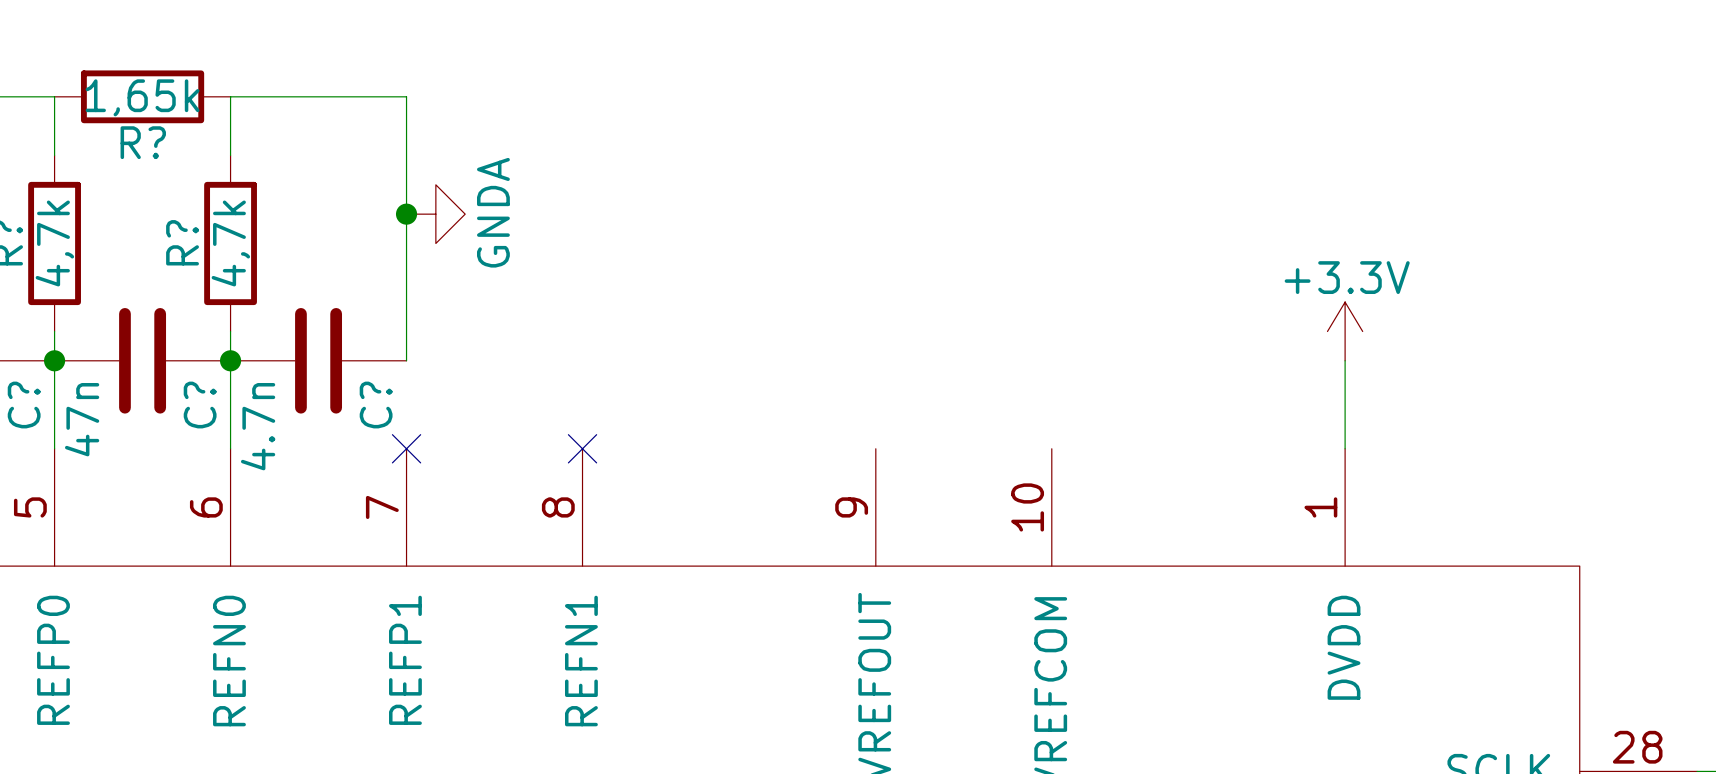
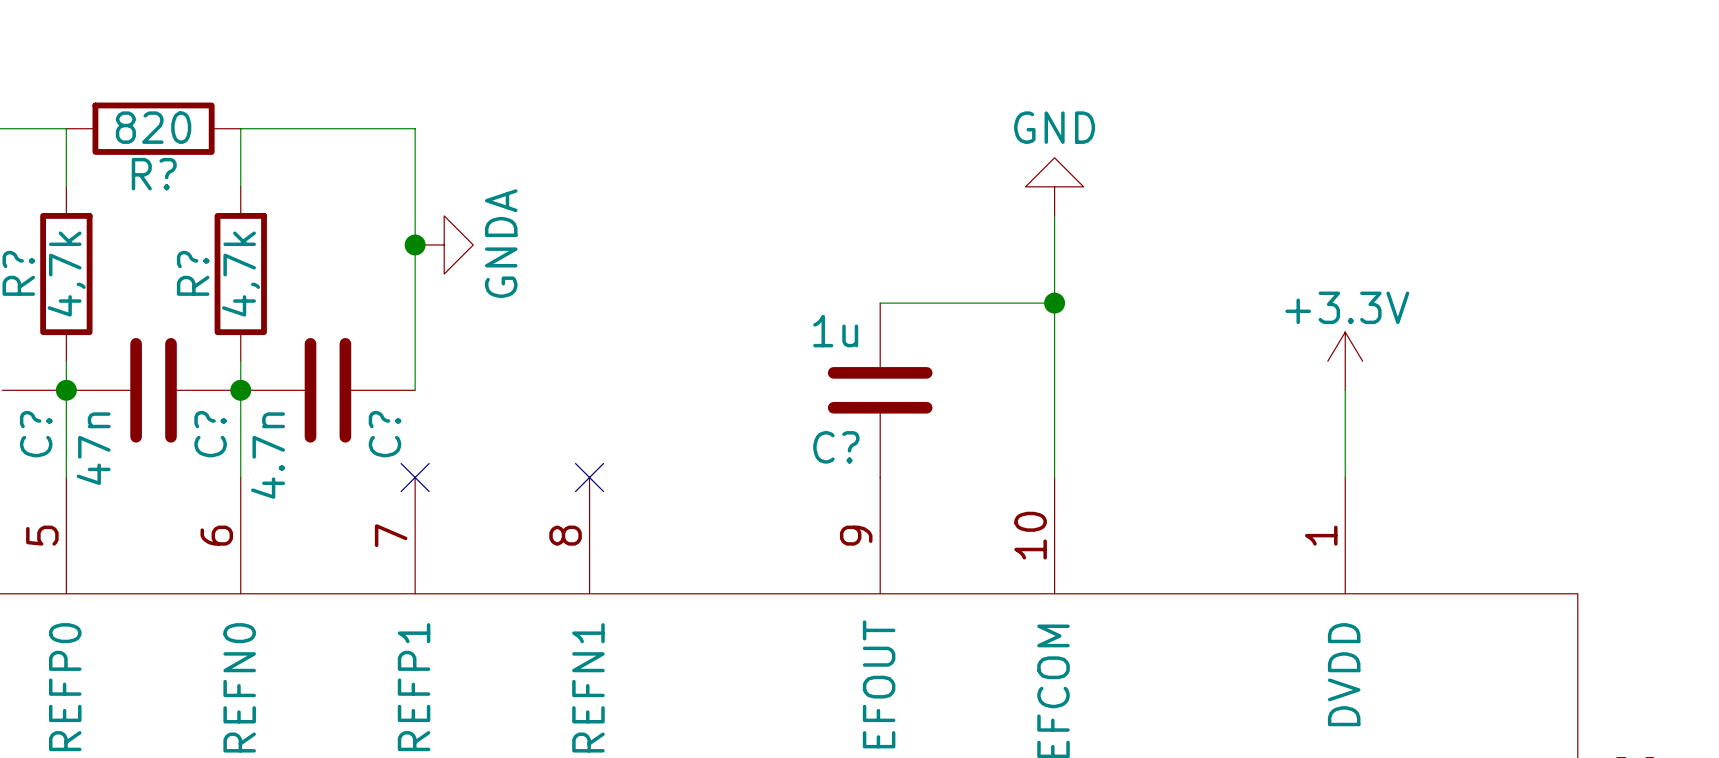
R? value: 1,65k (142, 97) -> 820 (153, 127)
power symbol: none -> GND (1054, 186)
wire: none -> (1054, 215) (1054, 477)
wire: none -> (880, 303) (1054, 303)
junction: none -> (1054, 303)
C?: none -> 1u (880, 390)

